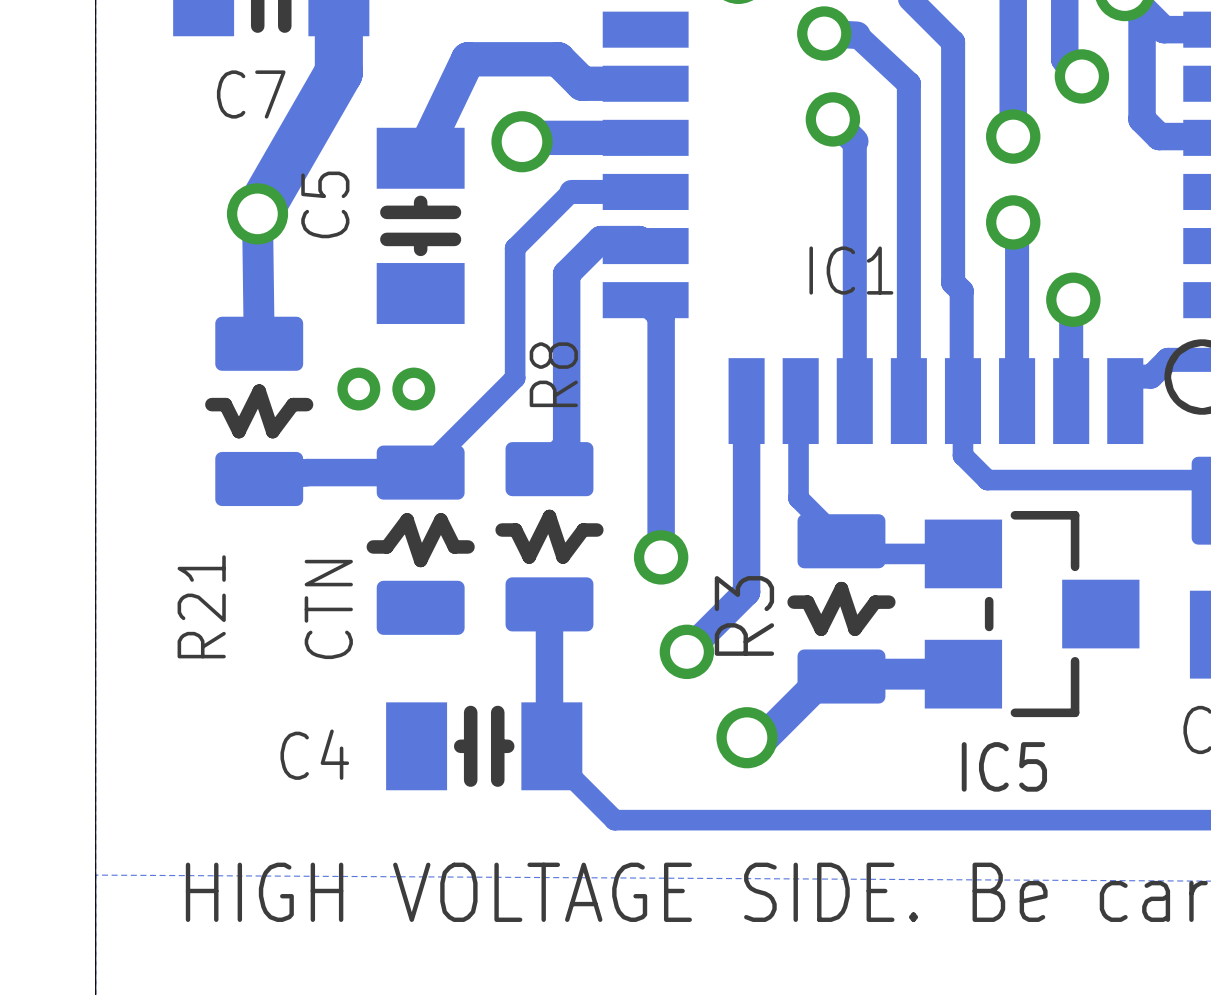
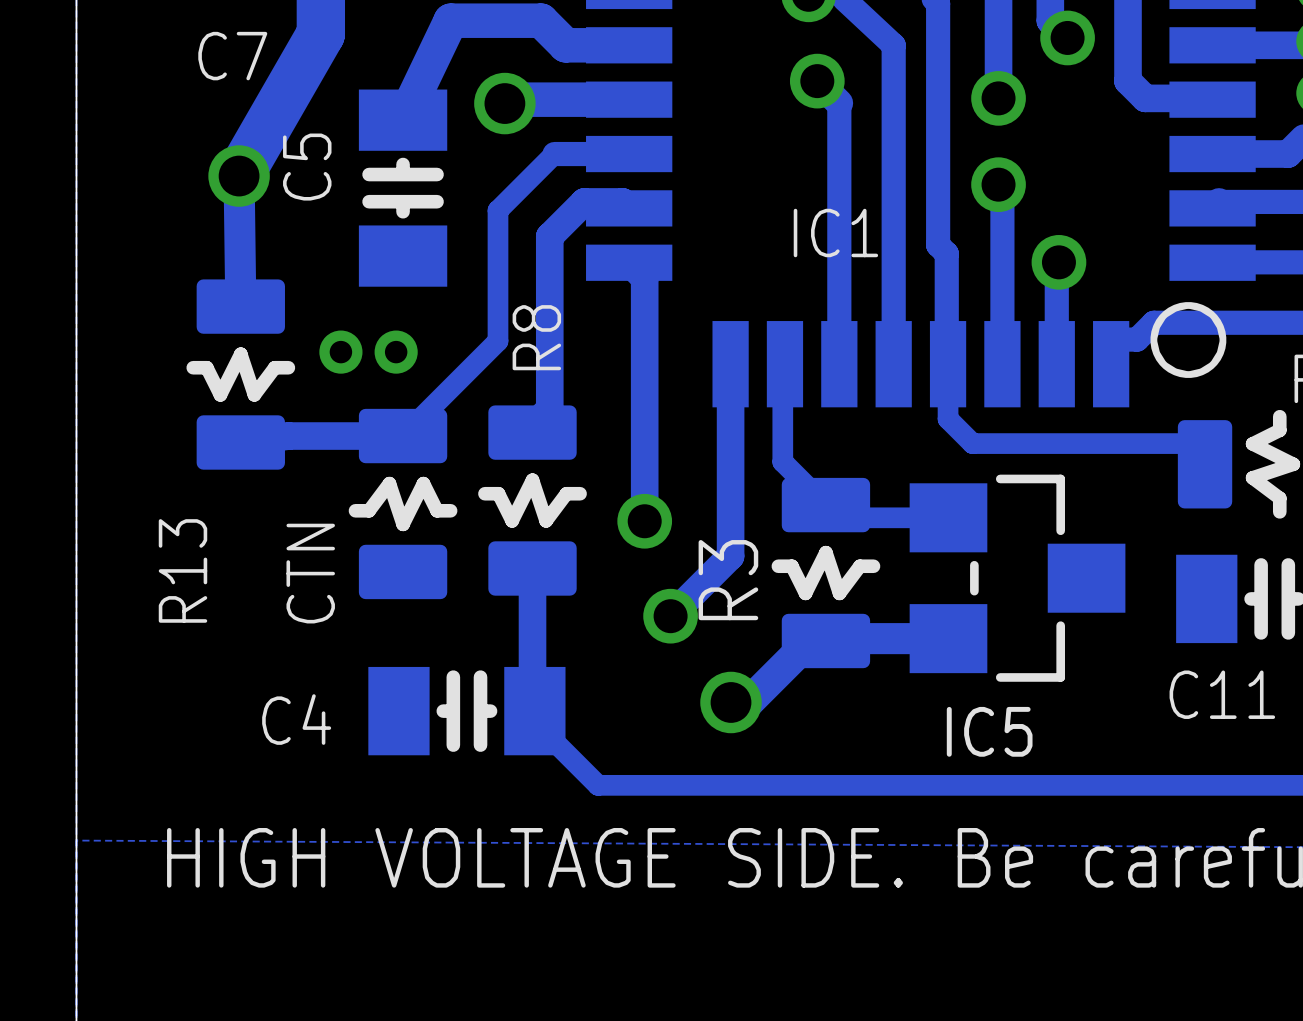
R21 name: R21 (201, 606) -> R13 (182, 570)

